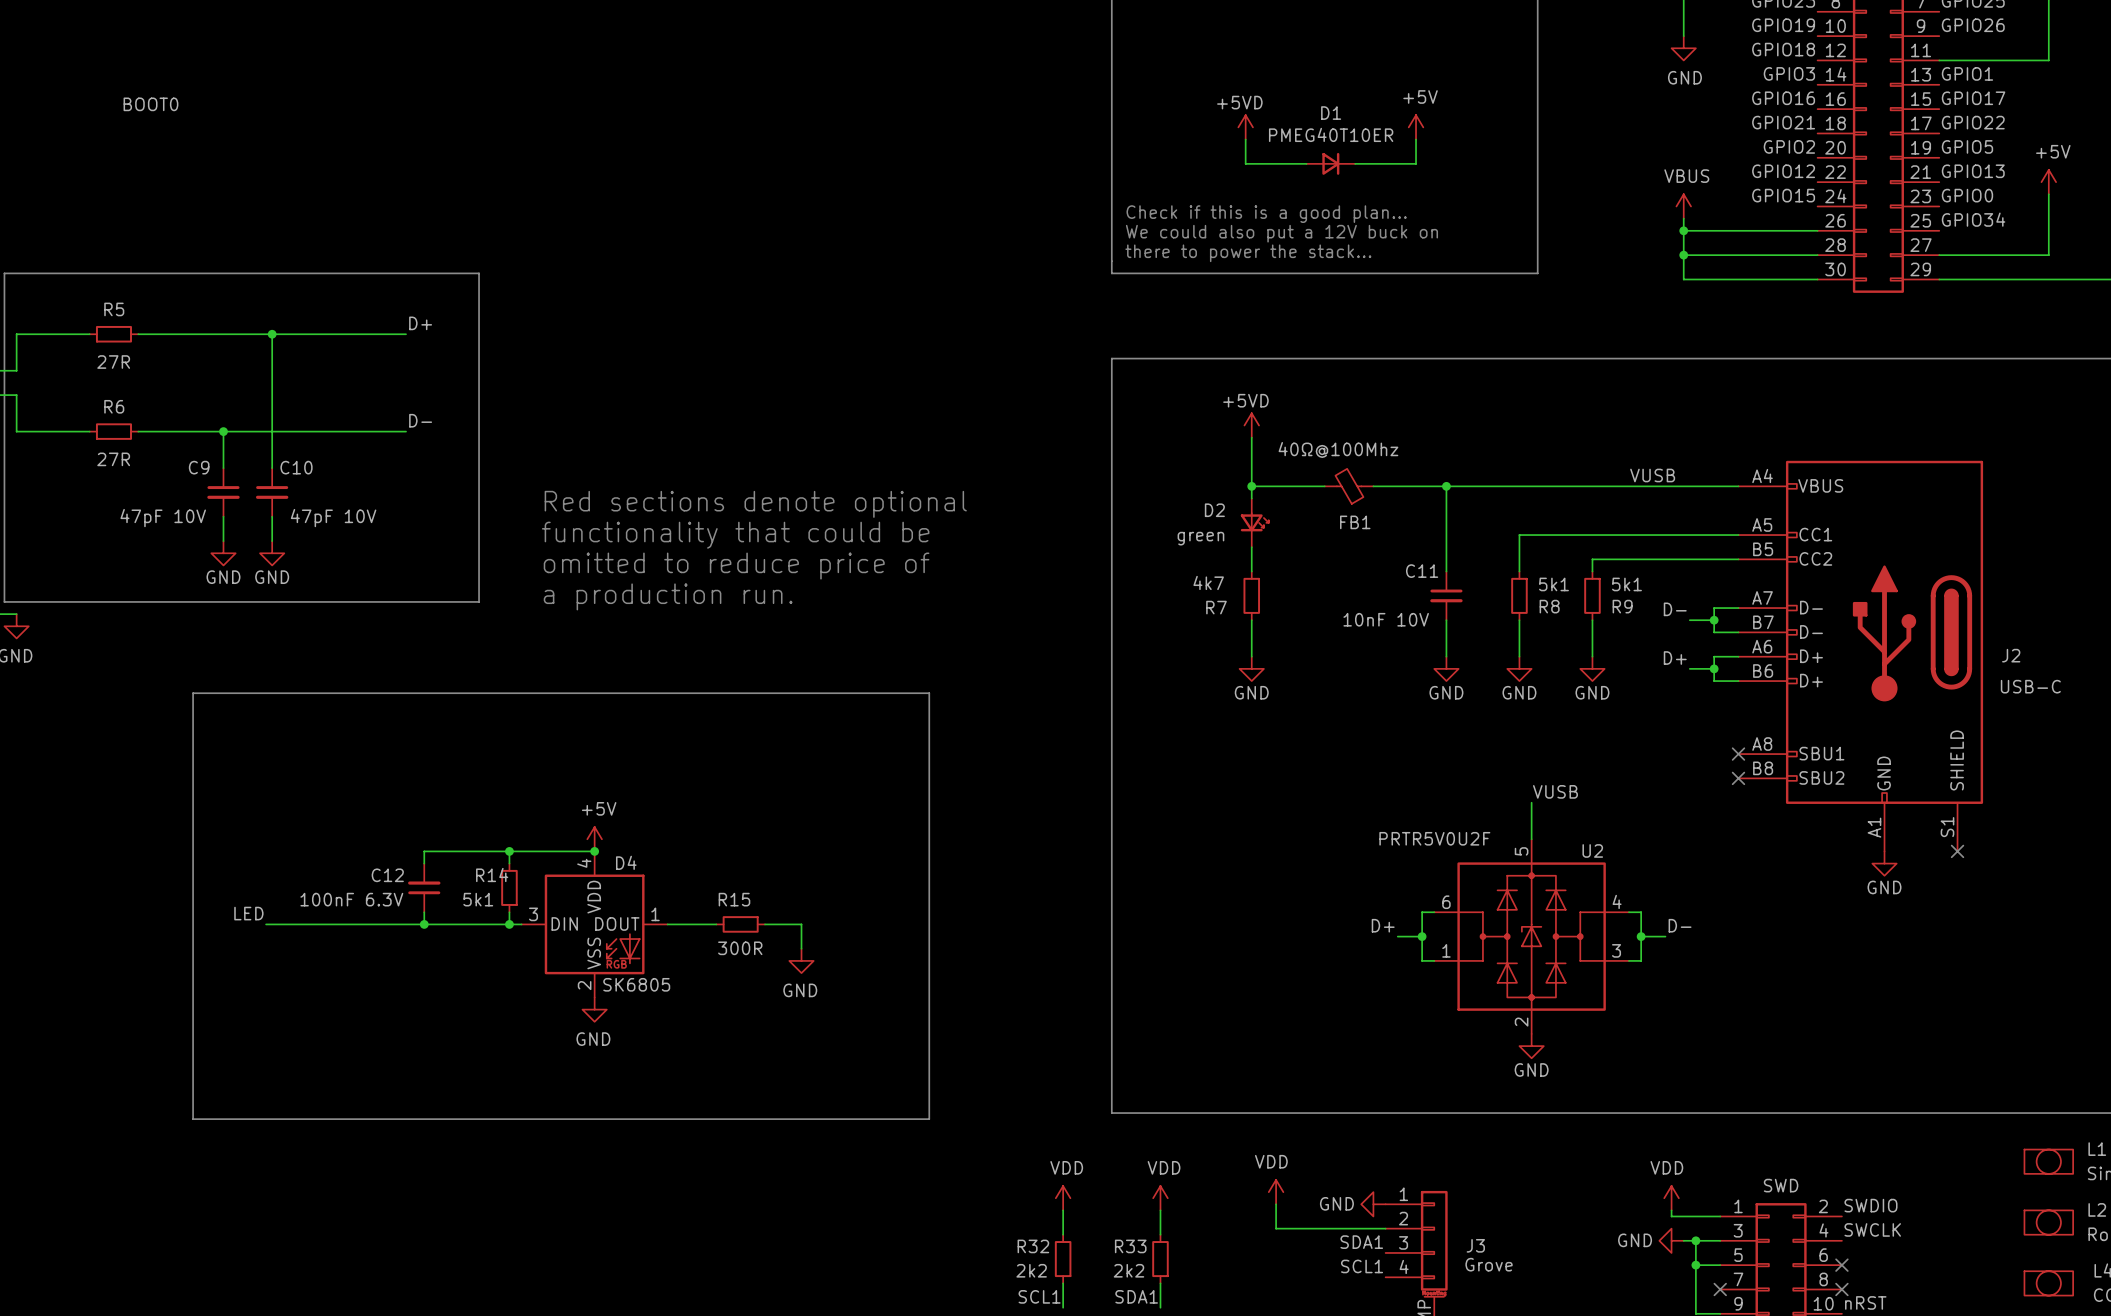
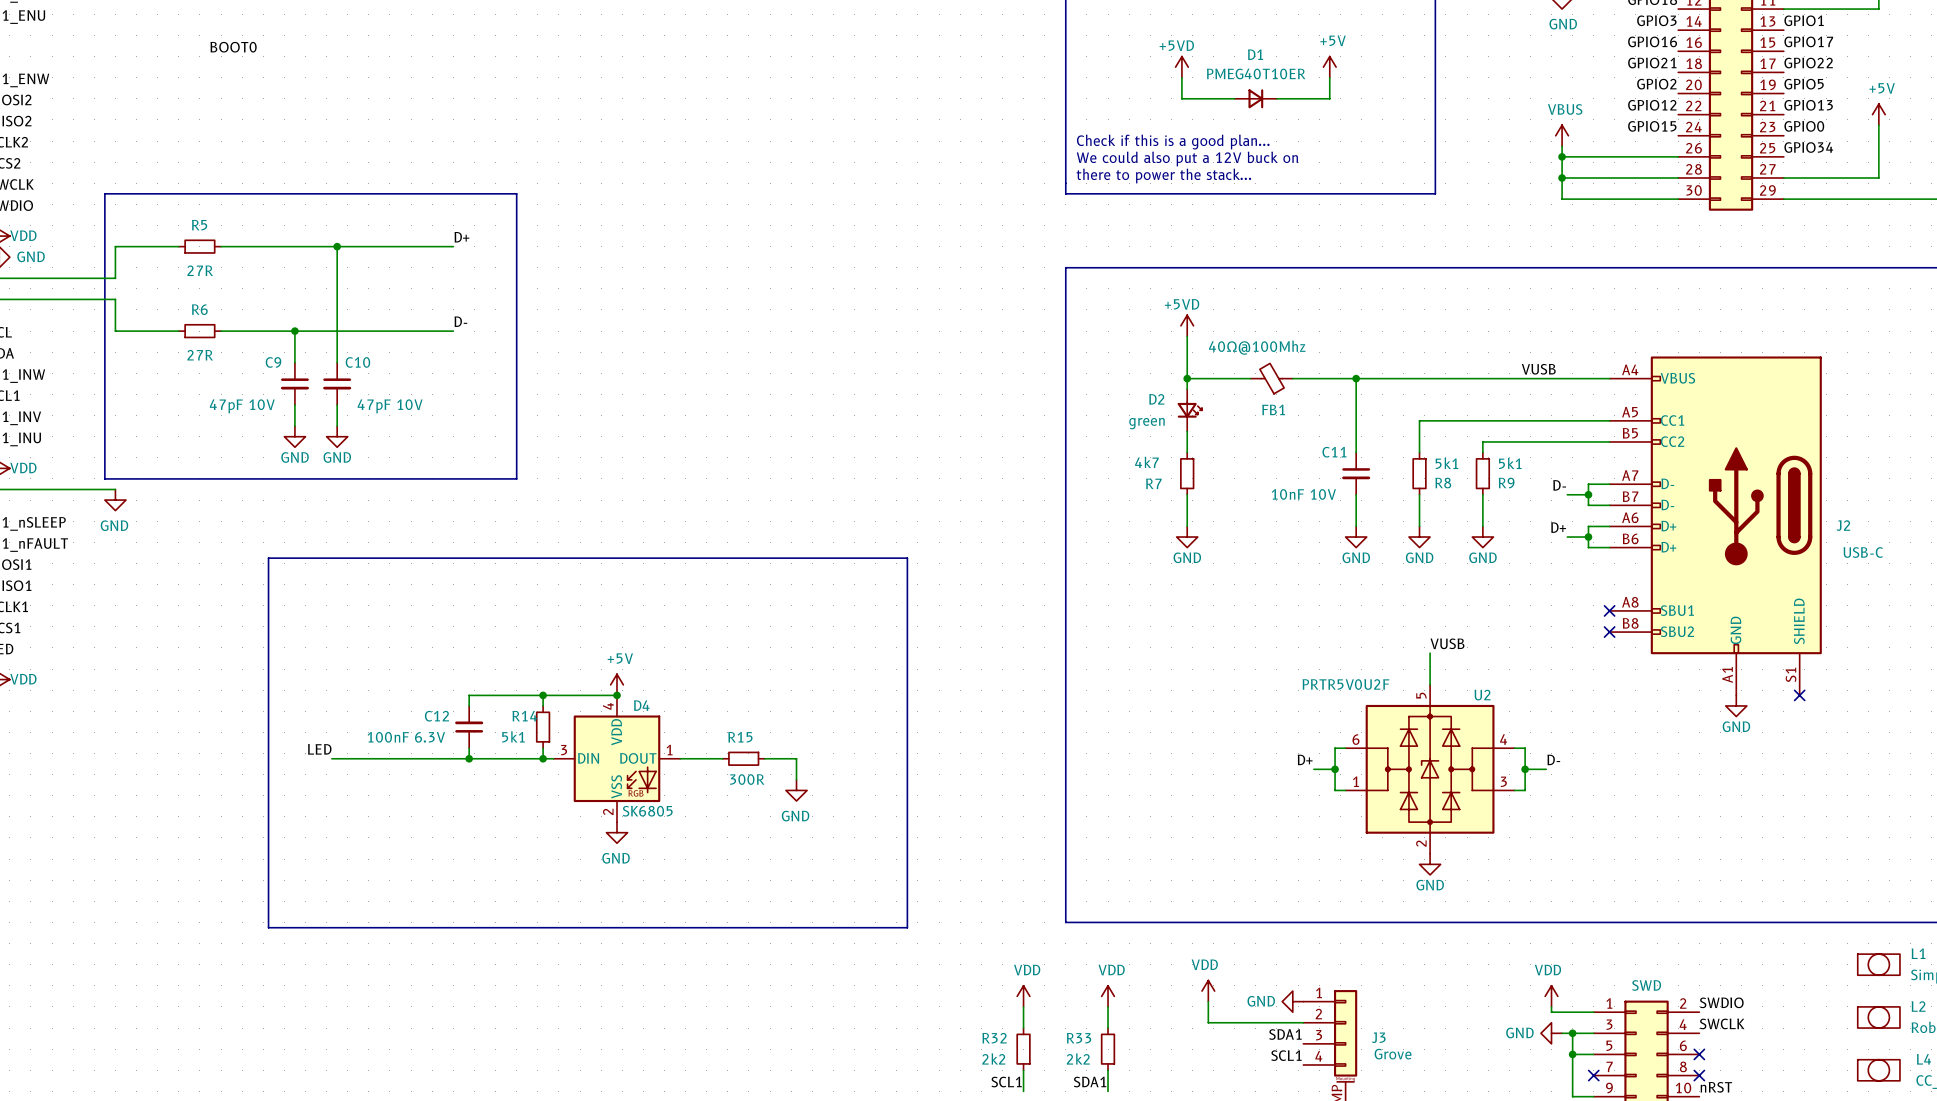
text: Red sections denote optional (755, 504) -> none
text: functionality that could be (735, 535) -> none
text: omitted to reduce price of (736, 566) -> none
text: a production run. (668, 596) -> none

